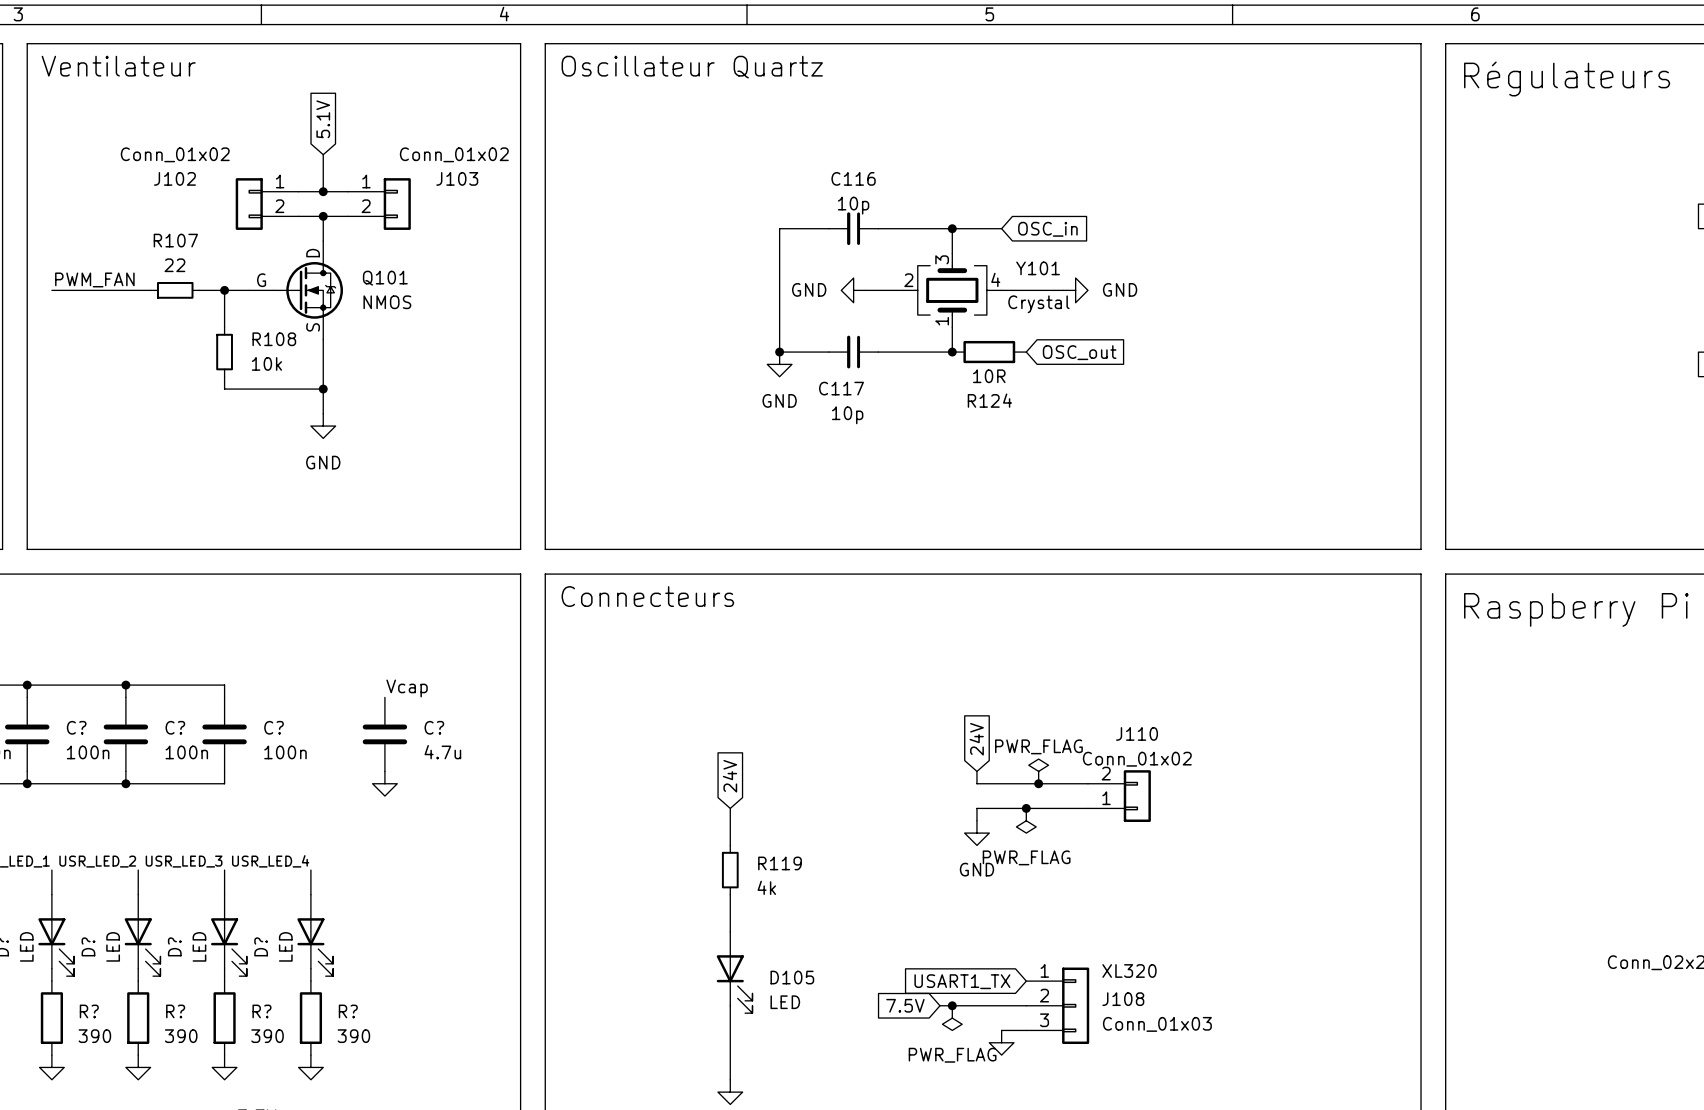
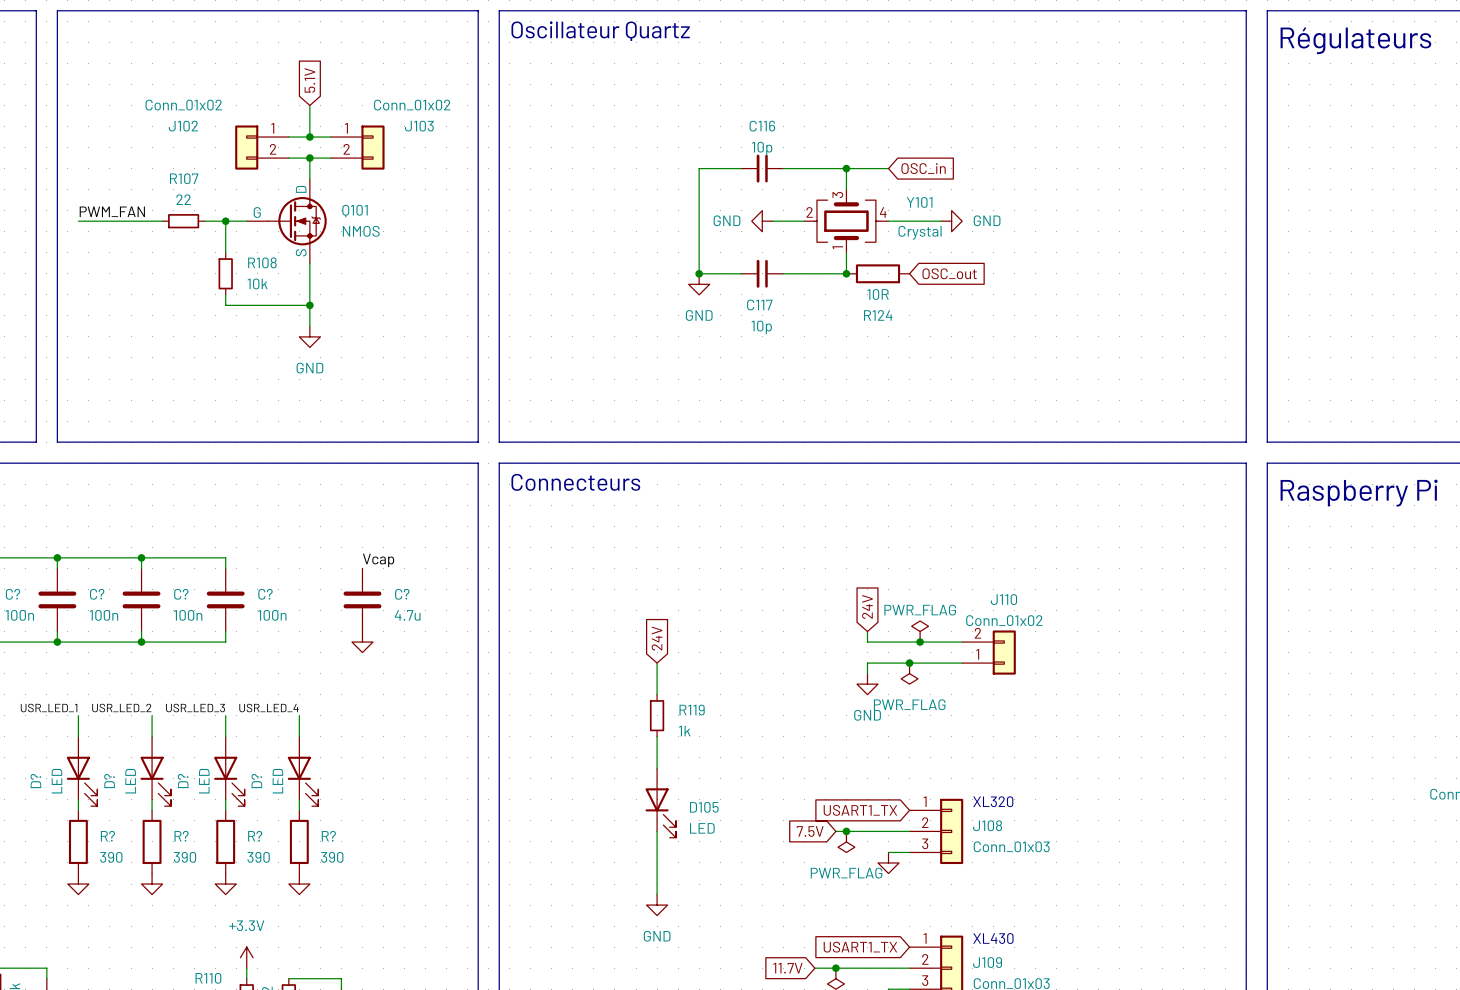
text: Ventilateur (118, 66) -> none
R119 value: 4k (766, 887) -> 1k (684, 731)

